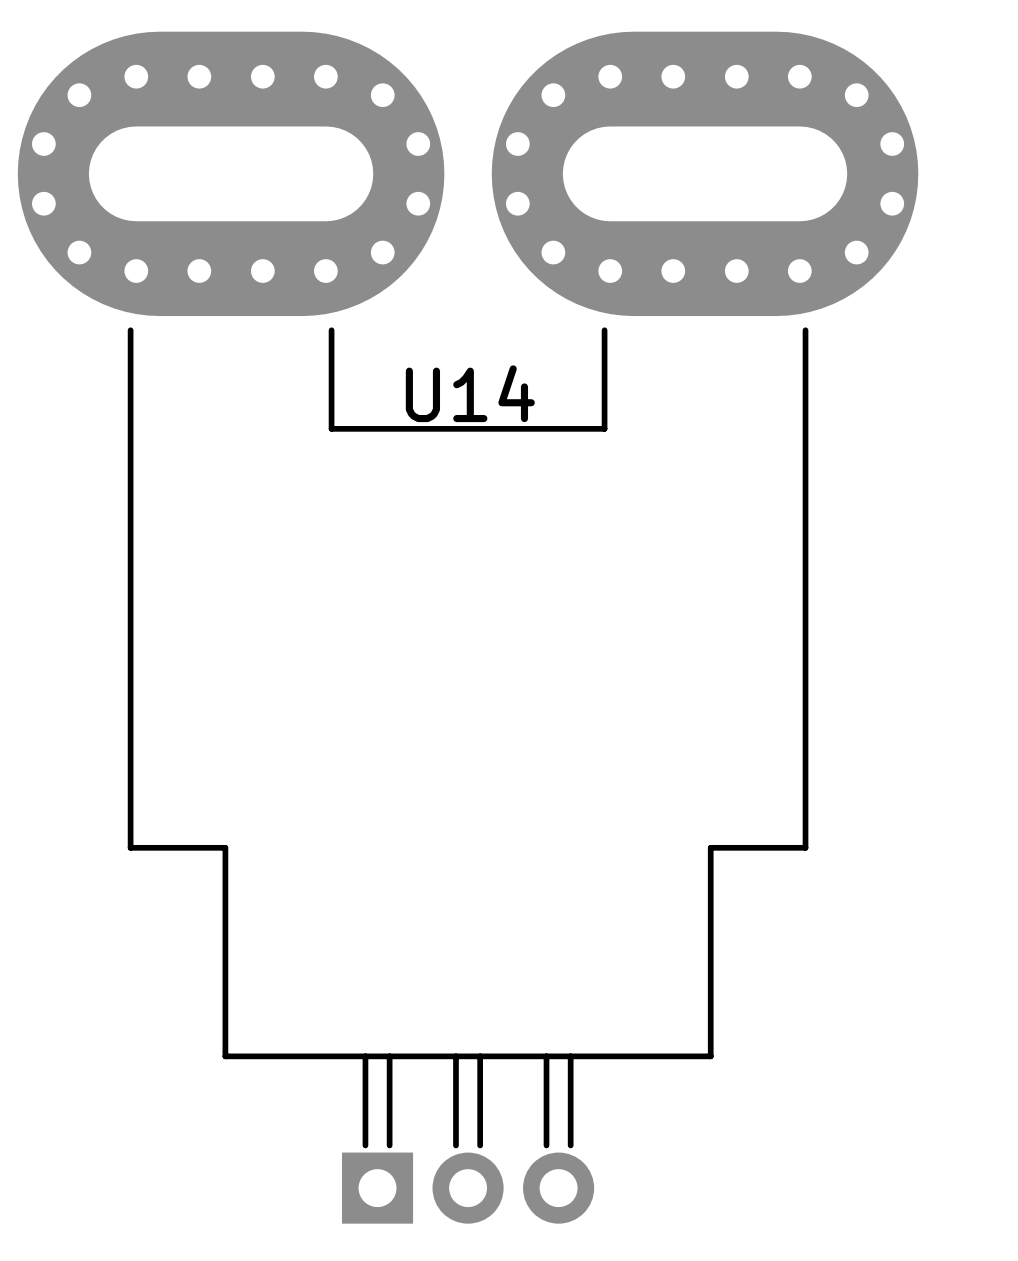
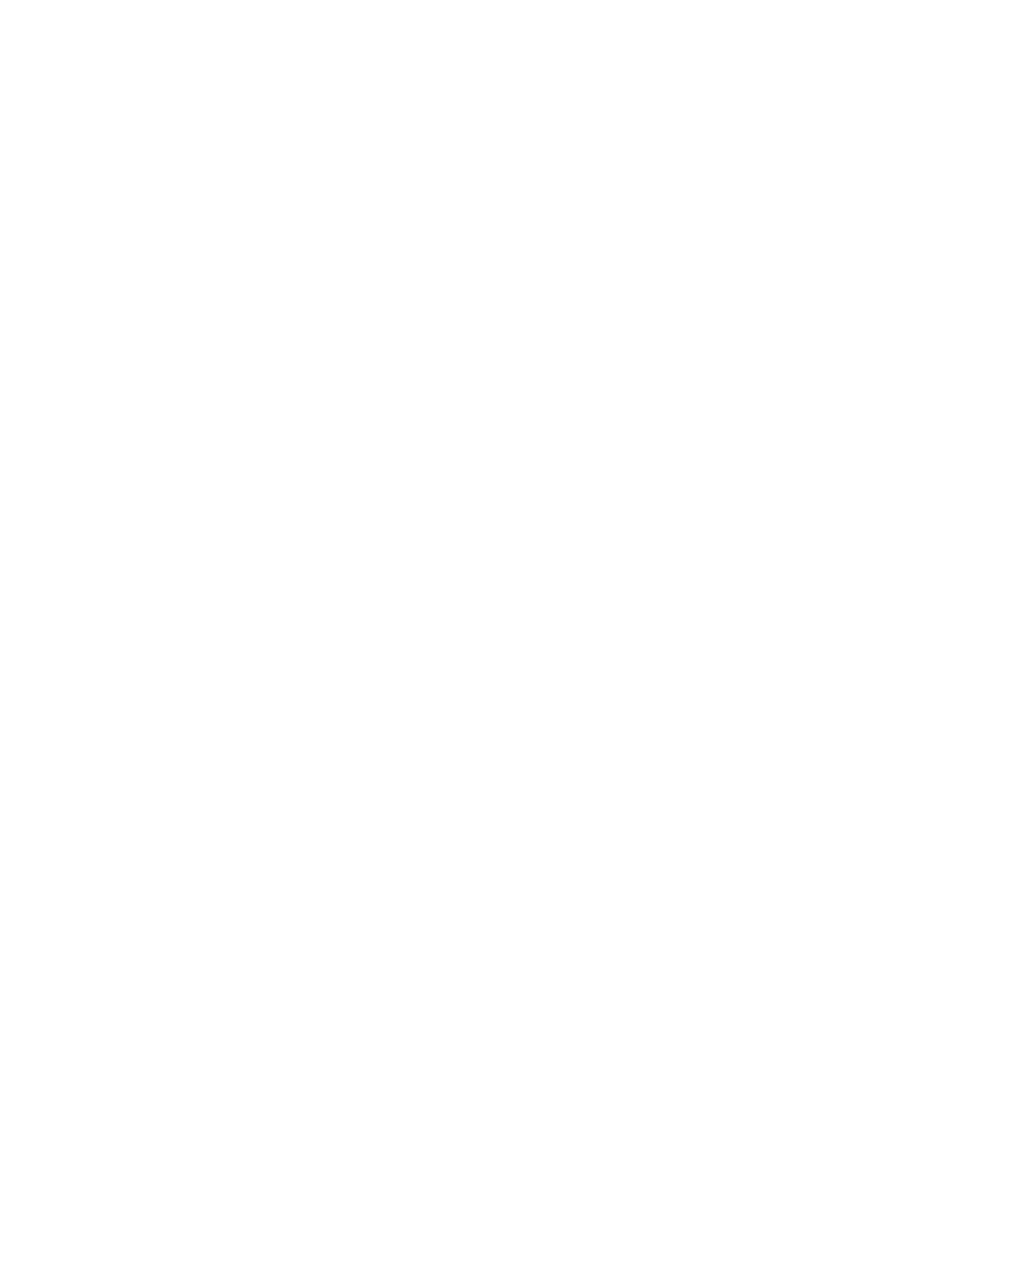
U14: (468, 627) -> none

